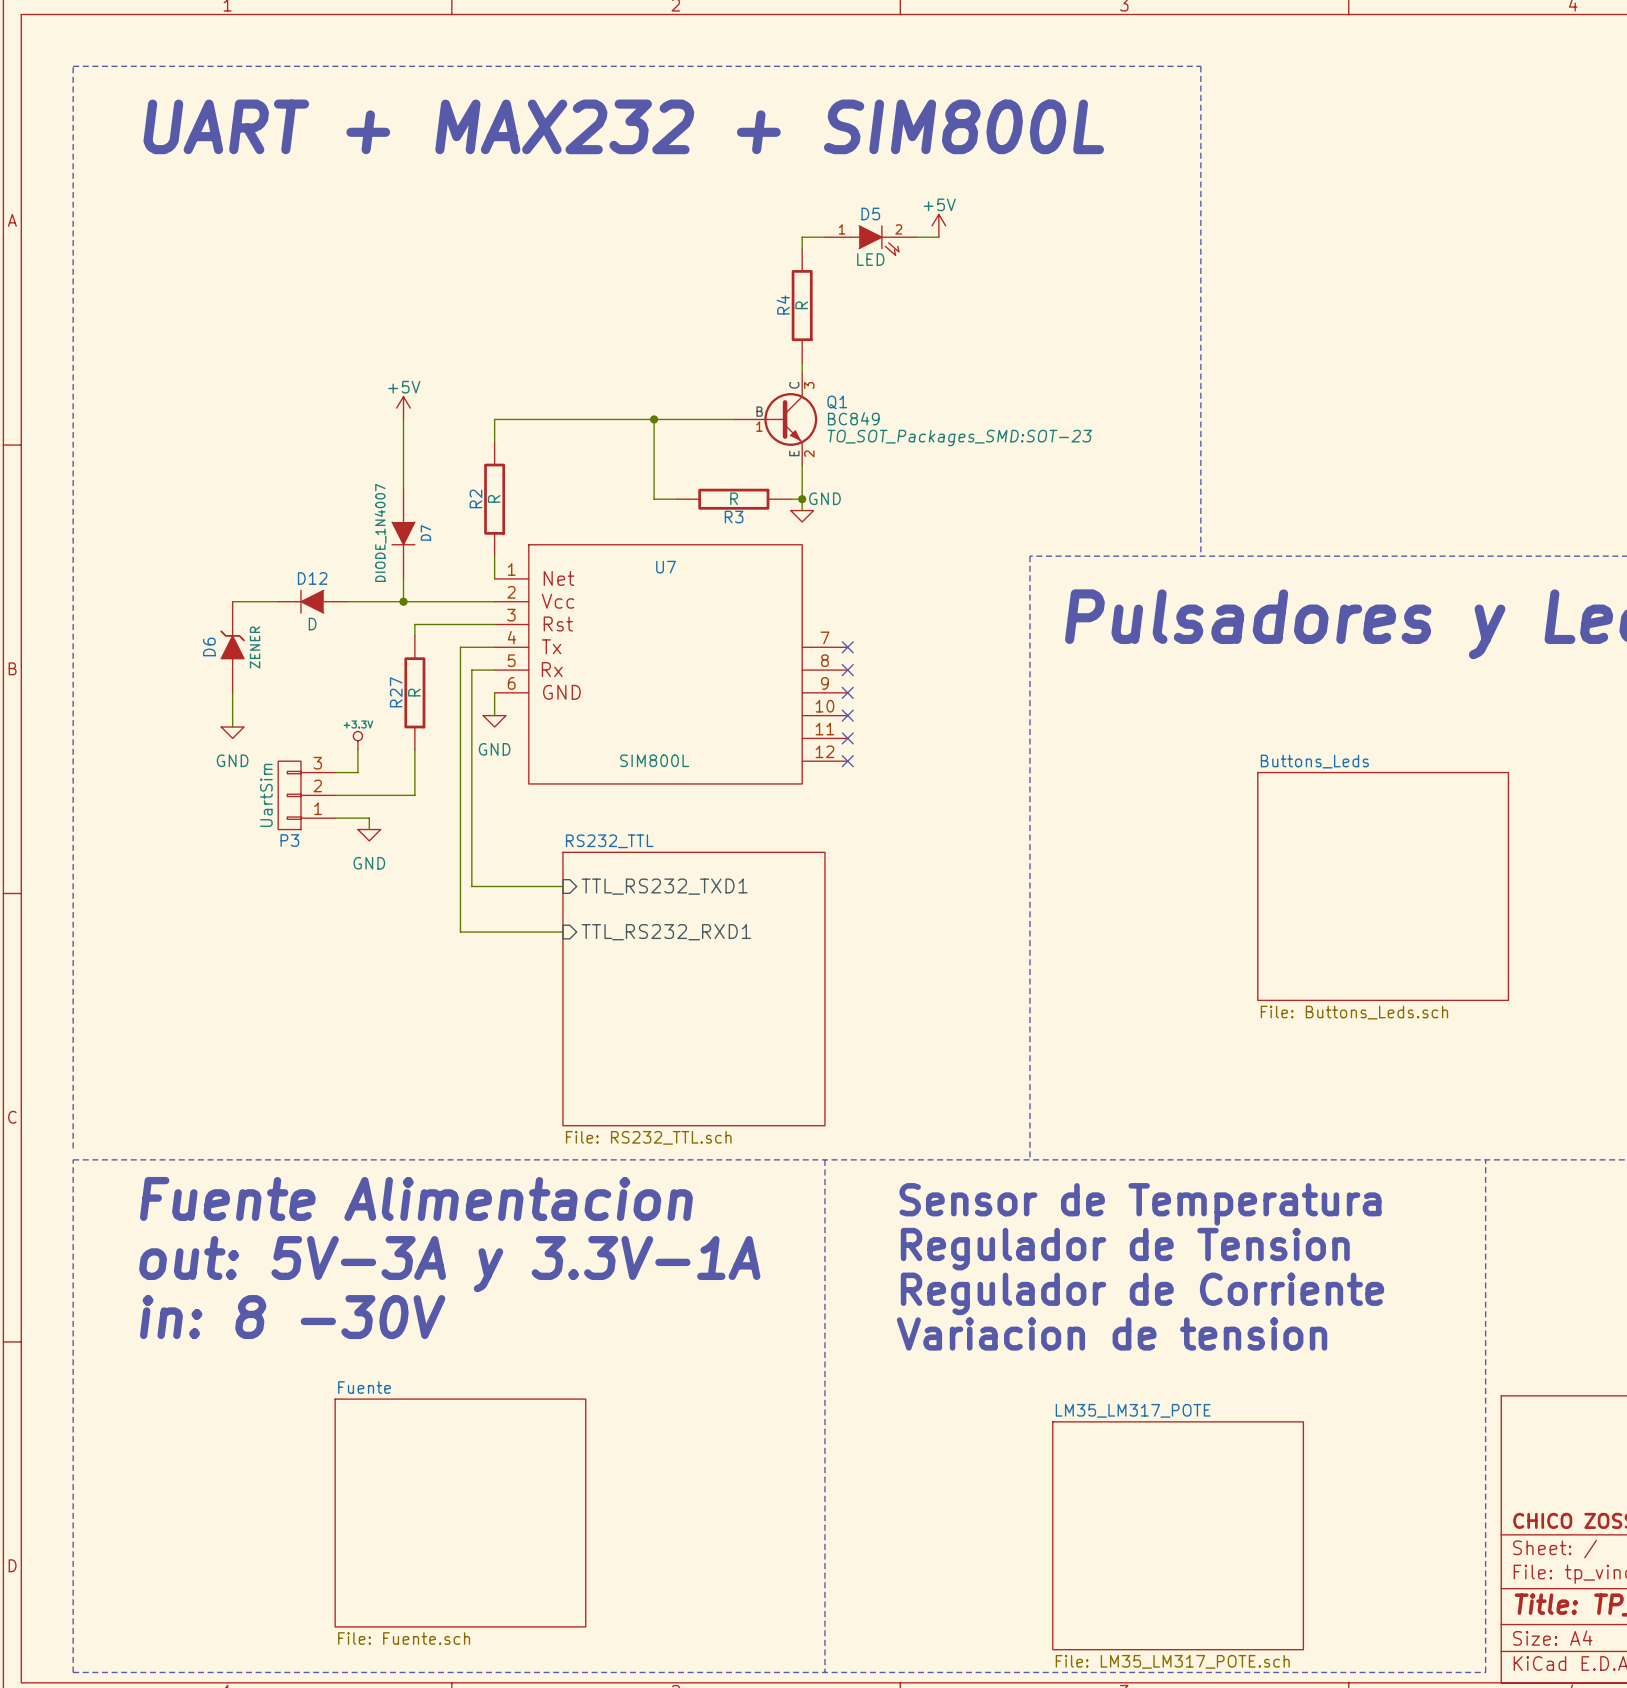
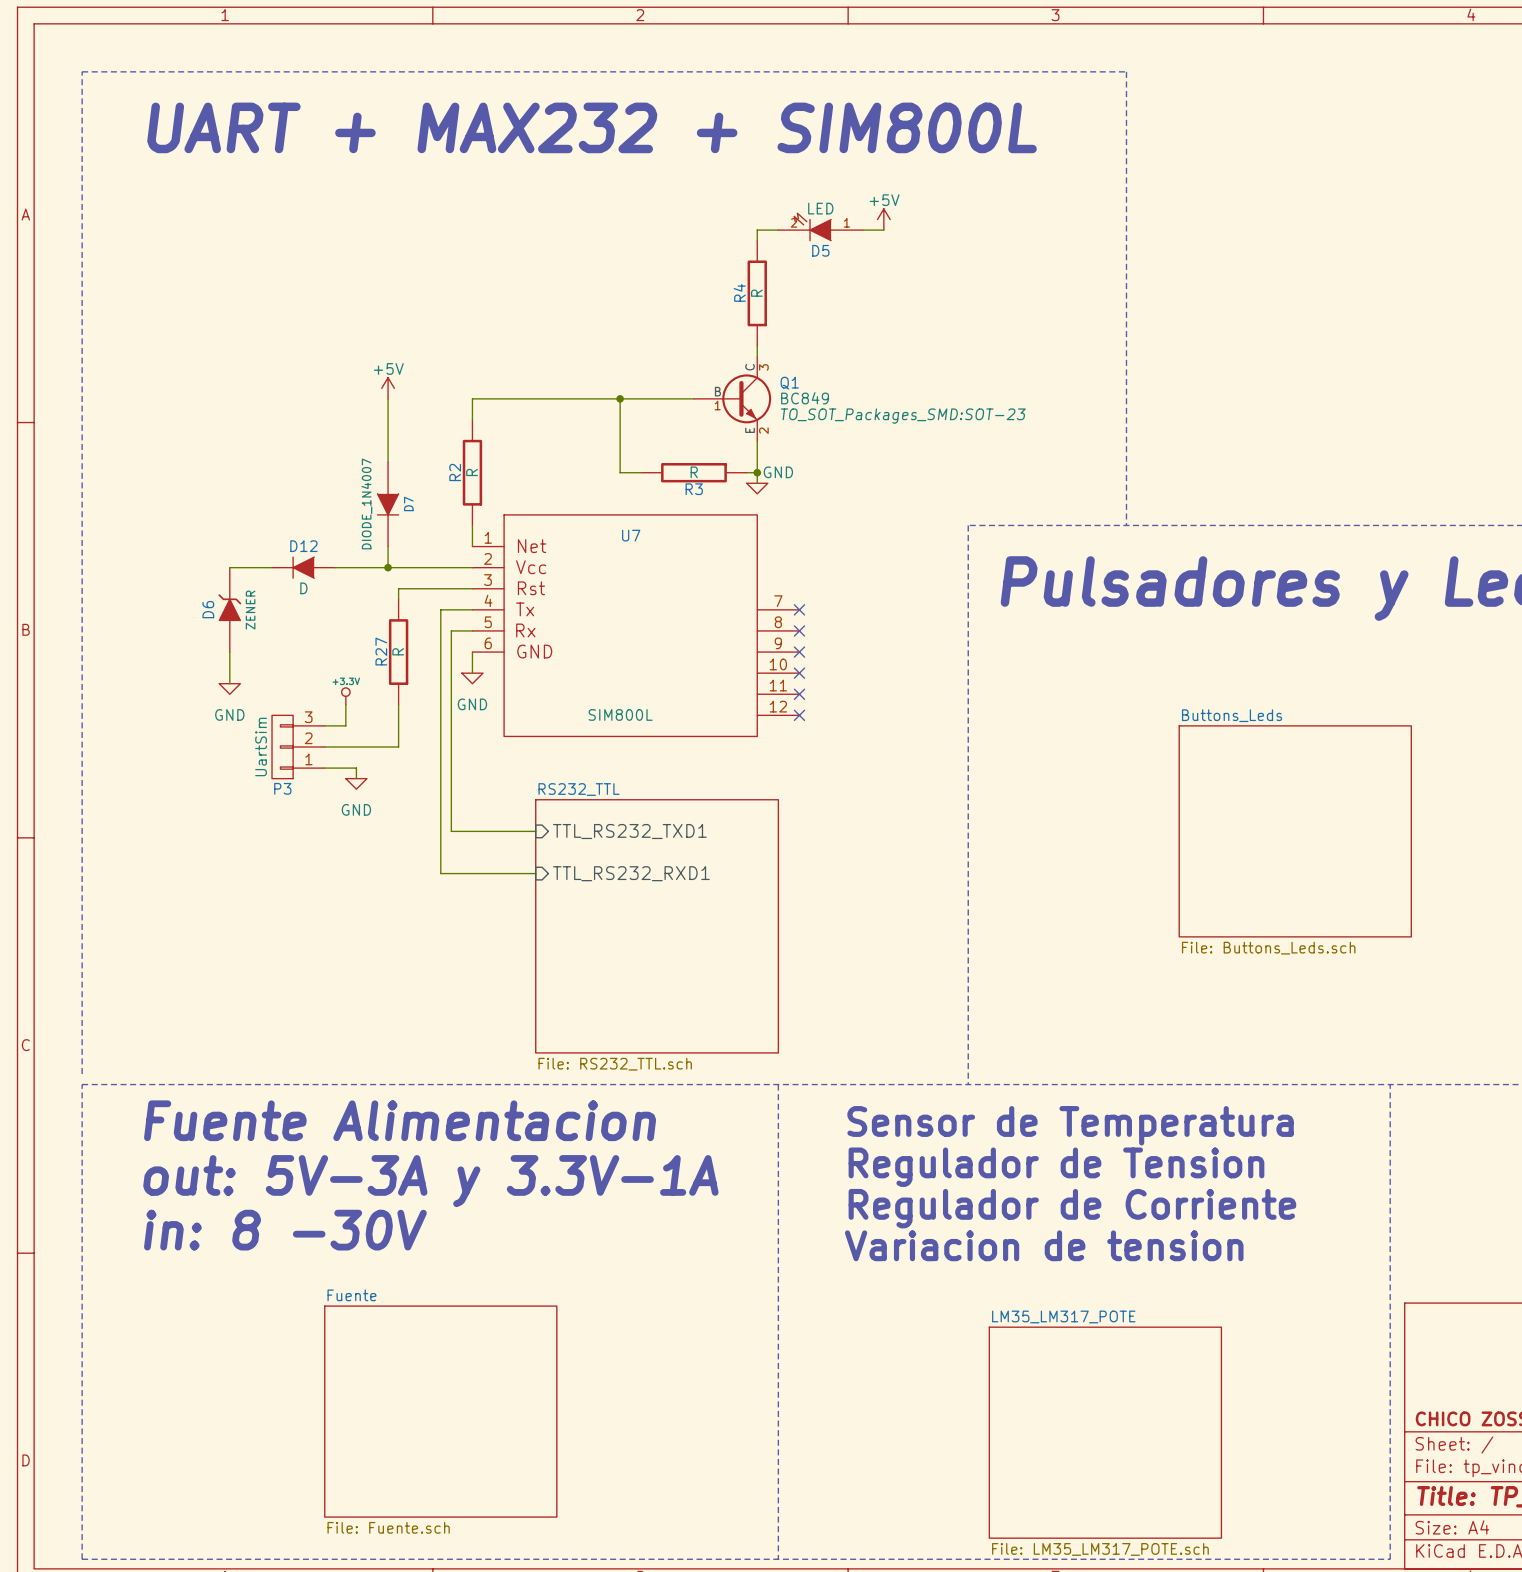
D5 rotation: 0° (879, 240) -> 180° (812, 226)

